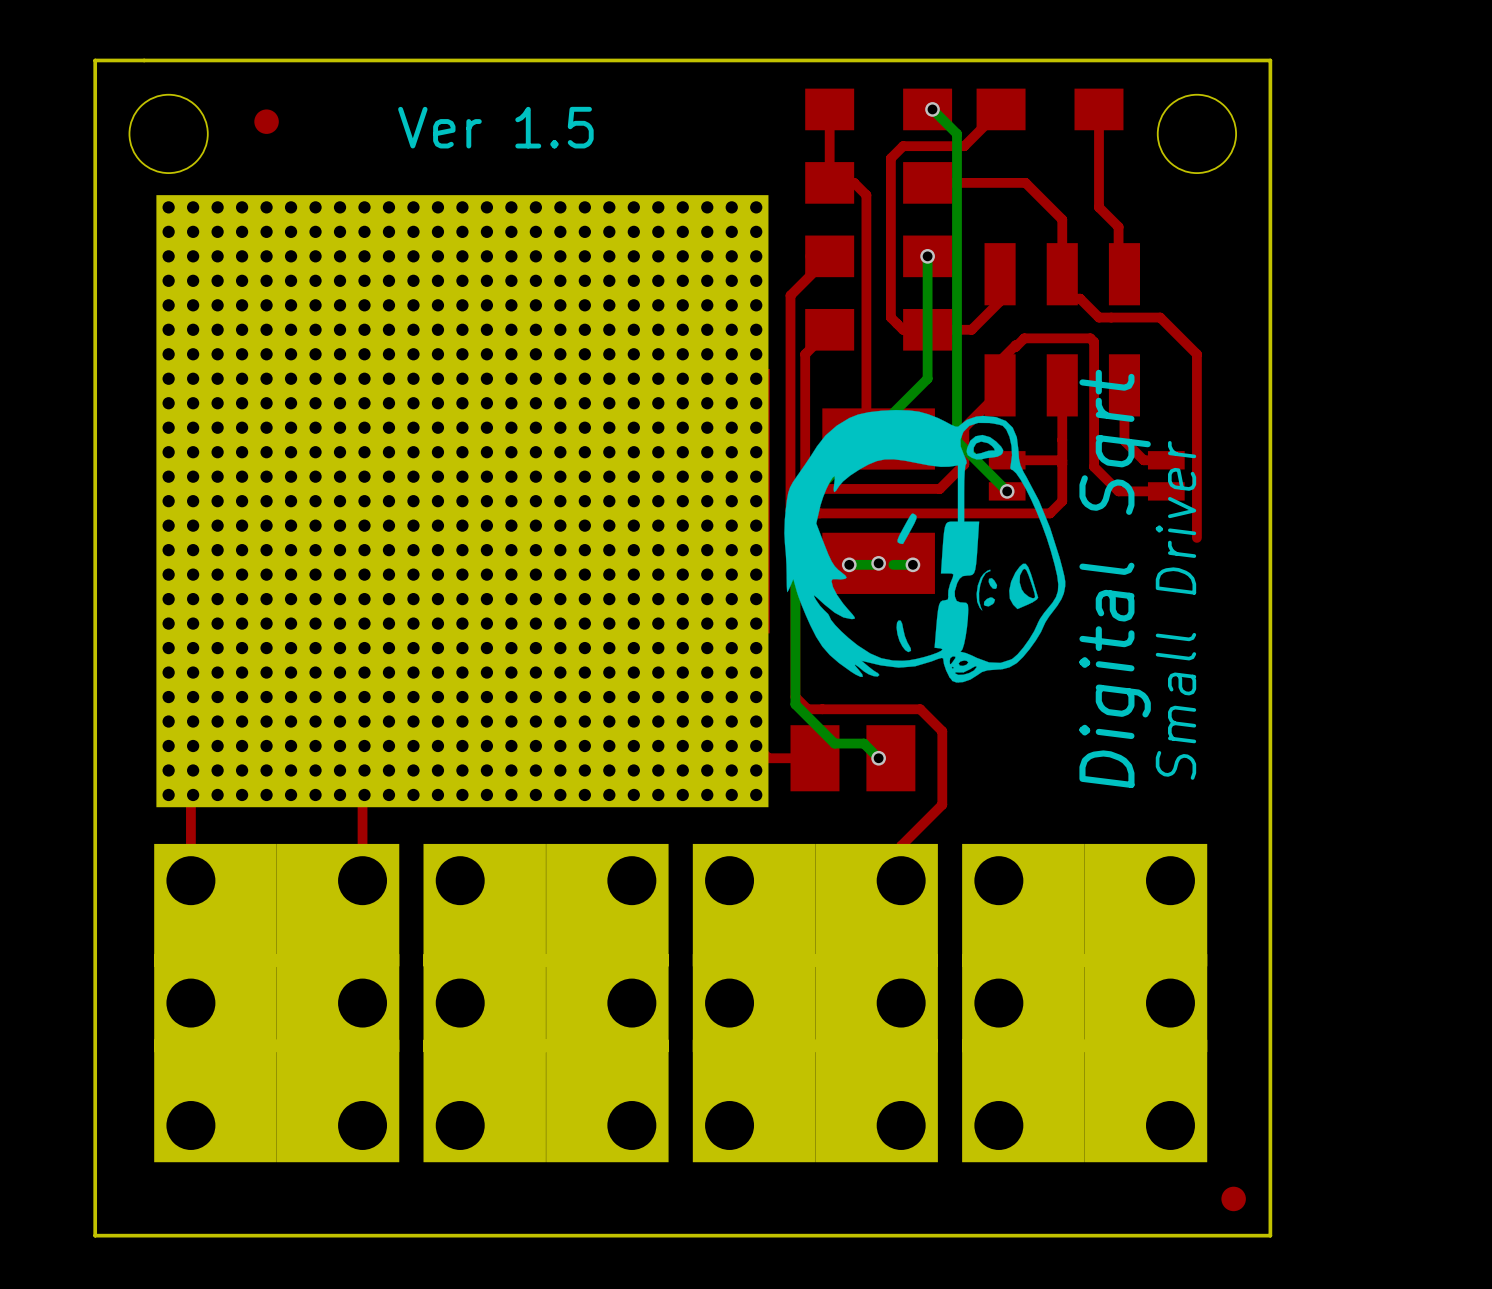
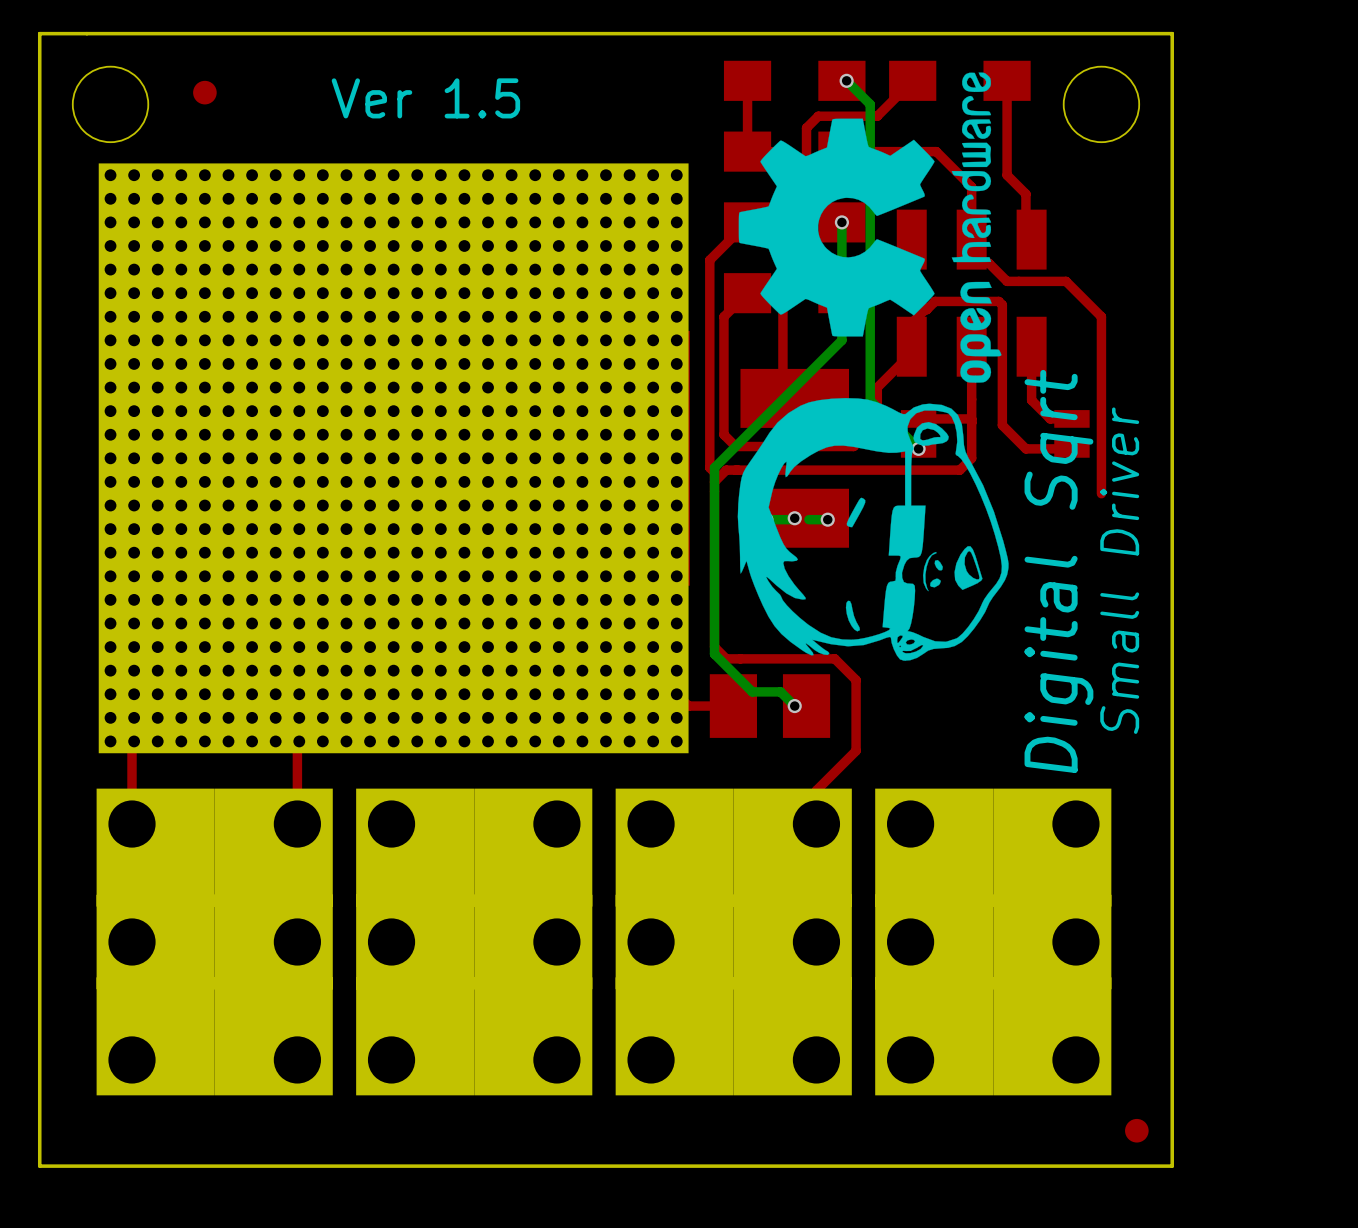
drawing: none -> [738, 72, 1002, 383]
drawing position: (924, 546) -> (873, 529)
text position: Digital Sqrt (1115, 578) -> Digital Sqrt (1058, 571)
text position: Small Driver (1175, 610) -> Small Driver (1119, 570)

